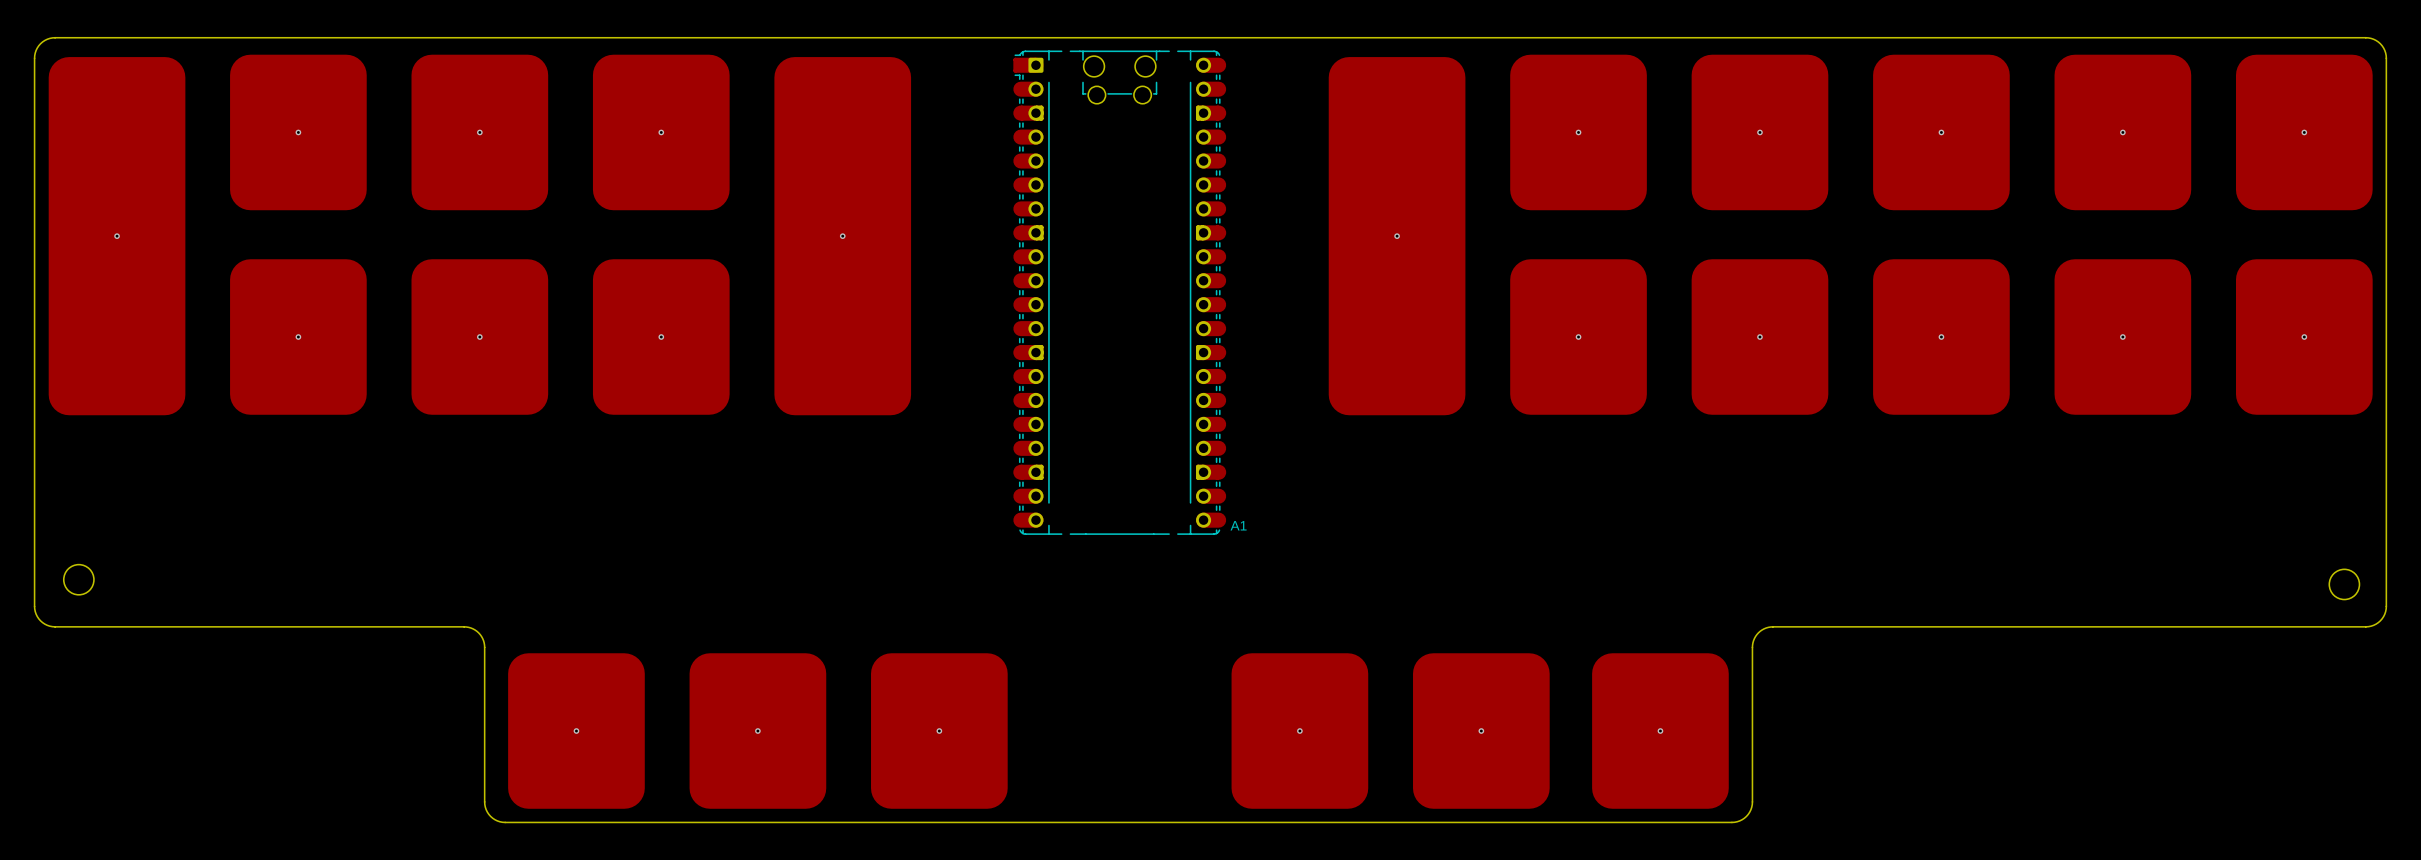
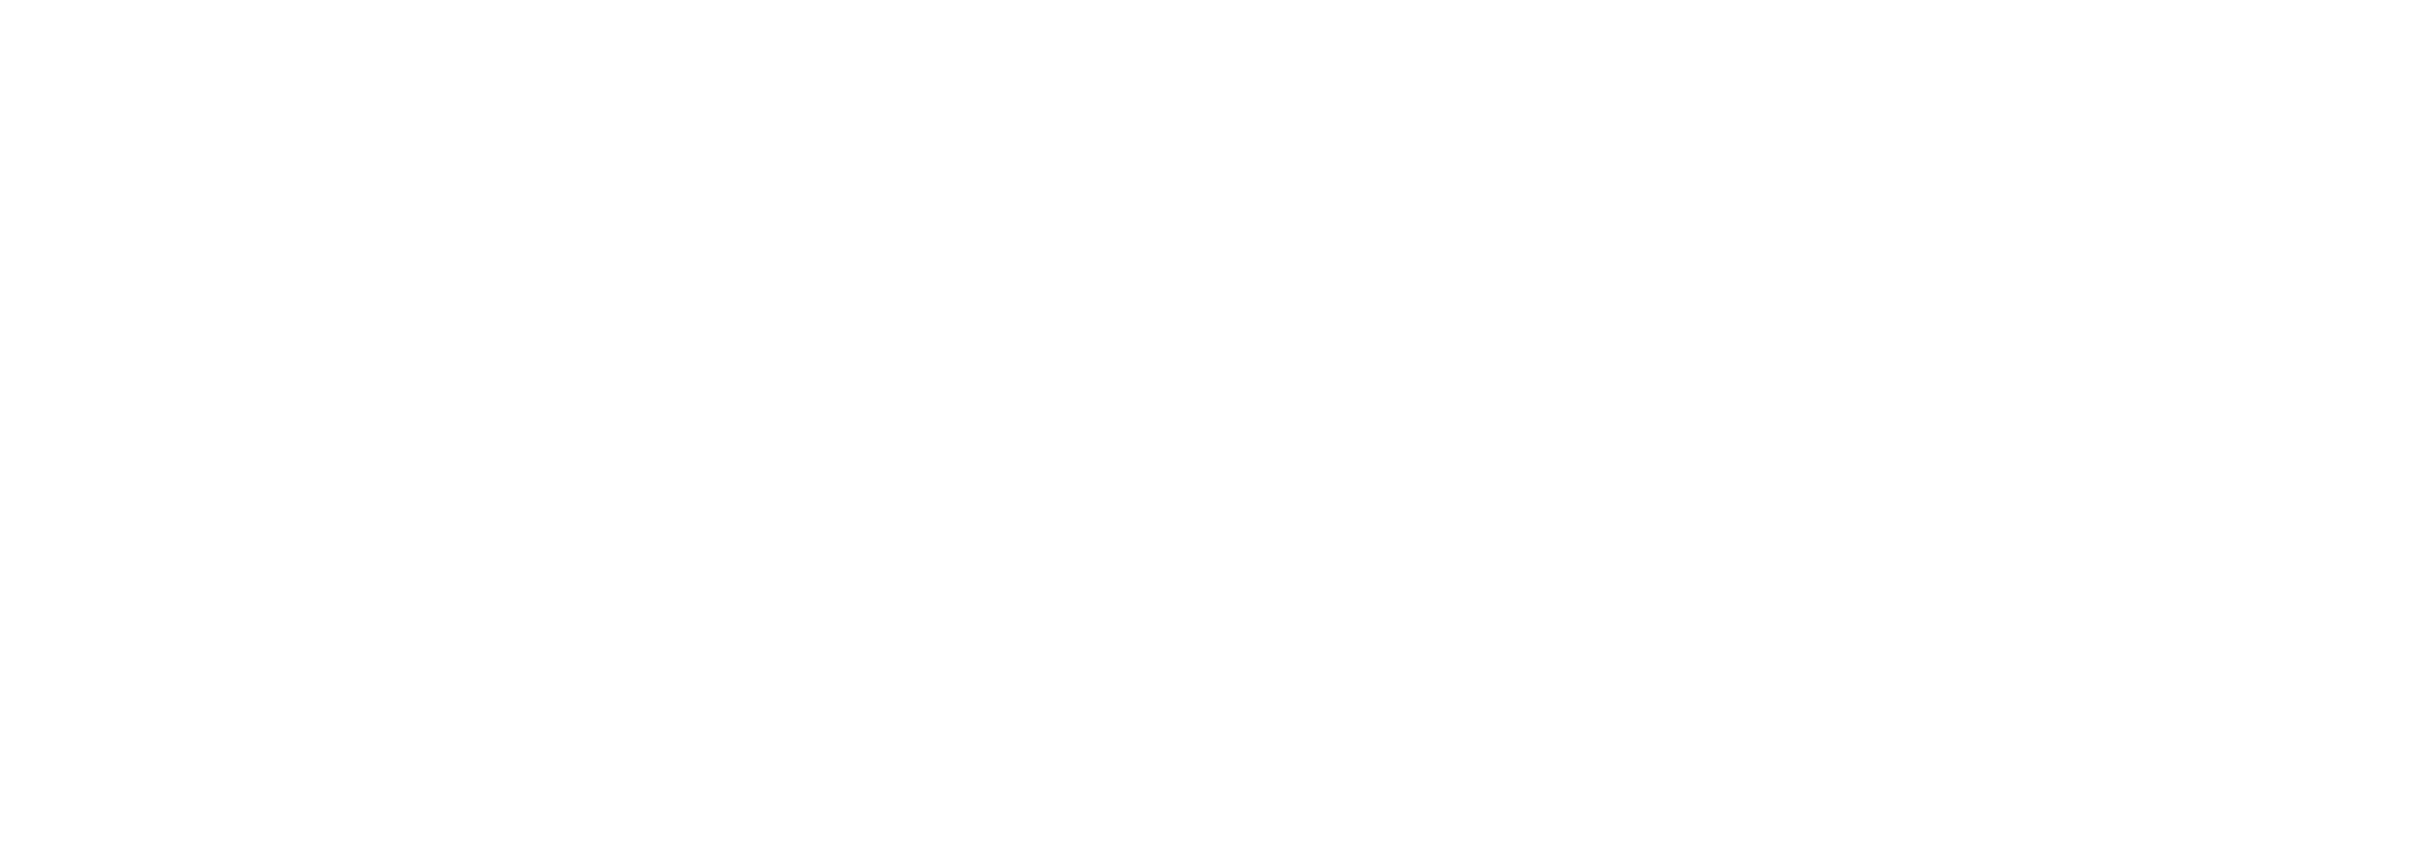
board edge: (55, 37) (2371, 38) (2382, 45) (2386, 58) (2385, 611) (2378, 622) (2365, 626) (1766, 628) (1756, 634) (1752, 645) (1752, 804) (1746, 816) (1734, 822) (499, 821) (488, 814) (484, 804) (484, 645) (481, 636) (473, 628) (464, 626) (55, 626) (44, 624) (37, 616) (34, 606) (34, 58) (36, 50) (40, 43) (47, 39) (55, 37) -> none
part: (298, 132) -> none
via: (298, 132) -> none
part: (479, 132) -> none
via: (479, 132) -> none
part: (661, 132) -> none
via: (661, 132) -> none
part: (1578, 132) -> none
via: (1578, 132) -> none
part: (1759, 132) -> none
via: (1759, 132) -> none
part: (1941, 132) -> none
via: (1941, 132) -> none
part: (2122, 132) -> none
via: (2122, 132) -> none
part: (2304, 132) -> none
via: (2304, 132) -> none
part: (117, 236) -> none
via: (117, 236) -> none
part: (842, 236) -> none
via: (842, 236) -> none
part: (1397, 236) -> none
via: (1397, 236) -> none
A1: (1119, 292) -> none
part: (298, 337) -> none
via: (298, 337) -> none
part: (479, 337) -> none
via: (479, 337) -> none
part: (661, 337) -> none
via: (661, 337) -> none
part: (1578, 337) -> none
via: (1578, 337) -> none
part: (1759, 337) -> none
via: (1759, 337) -> none
part: (1941, 337) -> none
via: (1941, 337) -> none
part: (2122, 337) -> none
via: (2122, 337) -> none
part: (2304, 337) -> none
via: (2304, 337) -> none
round board edge: [63, 564, 95, 596] -> none
round board edge: [2329, 569, 2360, 600] -> none
part: (576, 731) -> none
via: (576, 731) -> none
part: (757, 731) -> none
via: (757, 731) -> none
part: (939, 731) -> none
via: (939, 731) -> none
part: (1299, 731) -> none
via: (1299, 731) -> none
part: (1481, 731) -> none
via: (1481, 731) -> none
part: (1660, 731) -> none
via: (1660, 731) -> none

